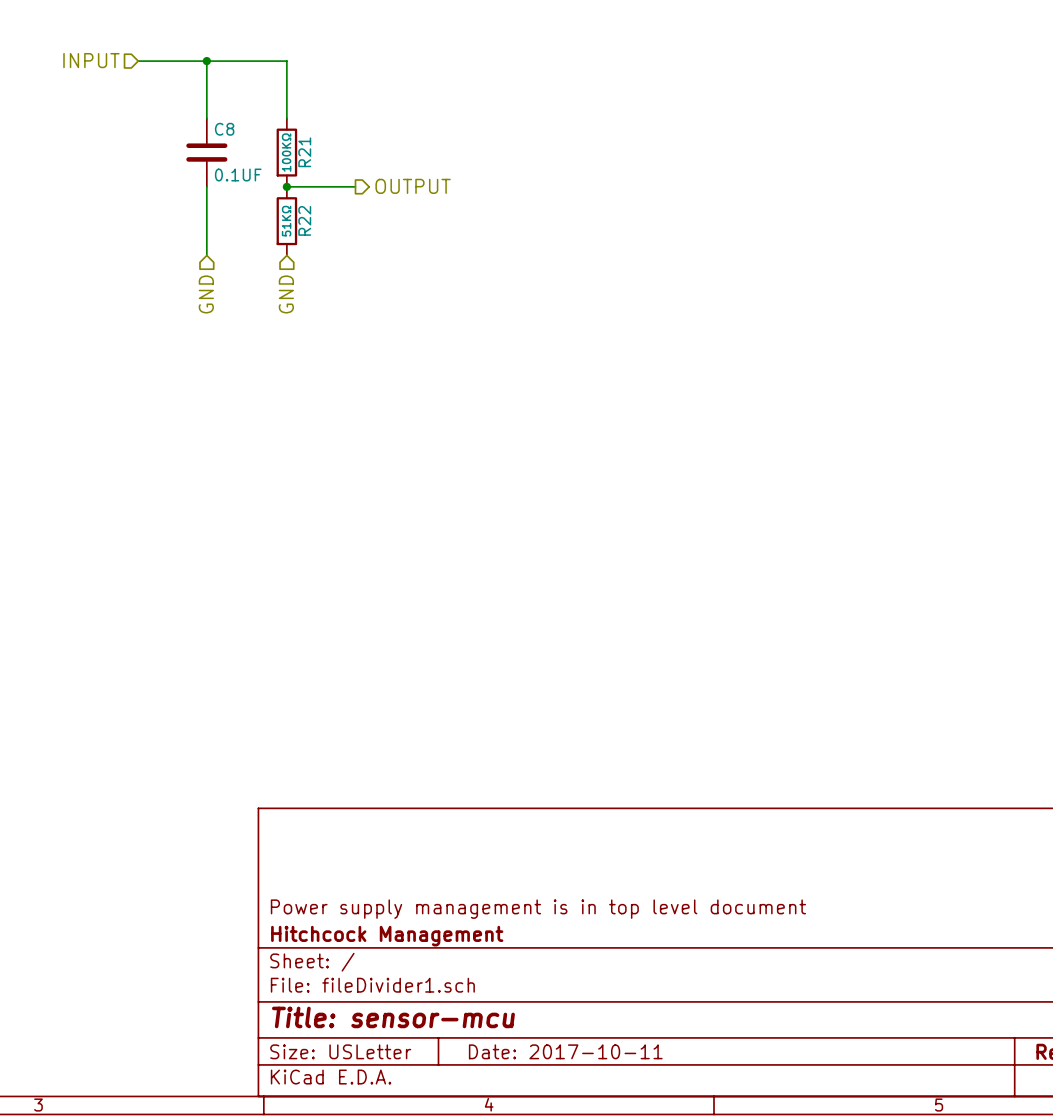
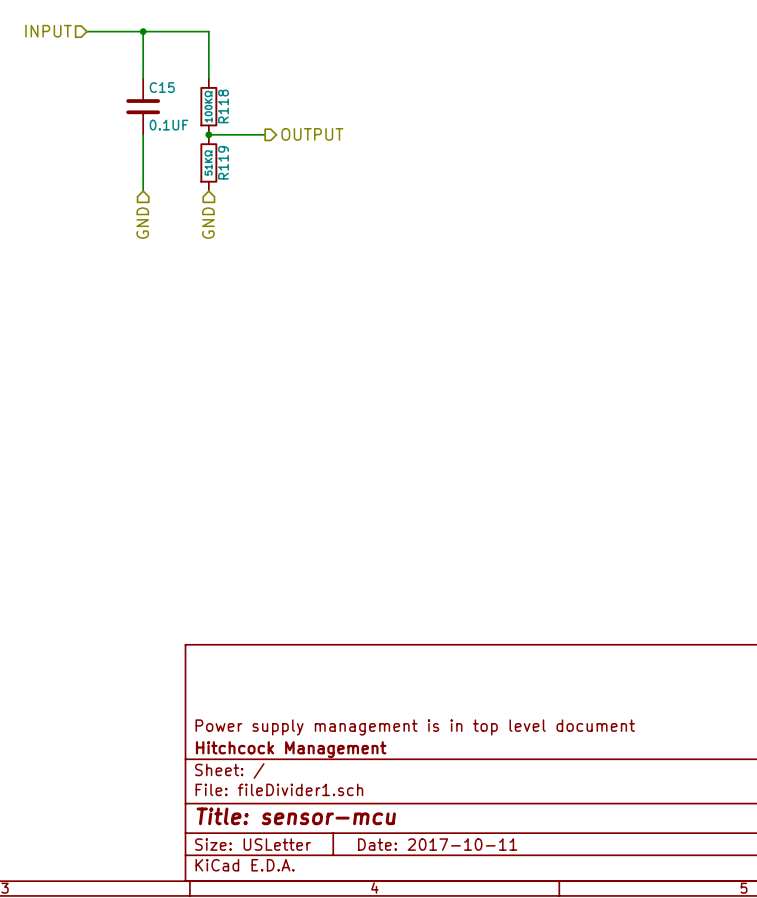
C8 name: C8 (224, 129) -> C15 (162, 87)
R21 name: R21 (304, 152) -> R118 (223, 106)
R22 name: R22 (304, 220) -> R119 (223, 162)

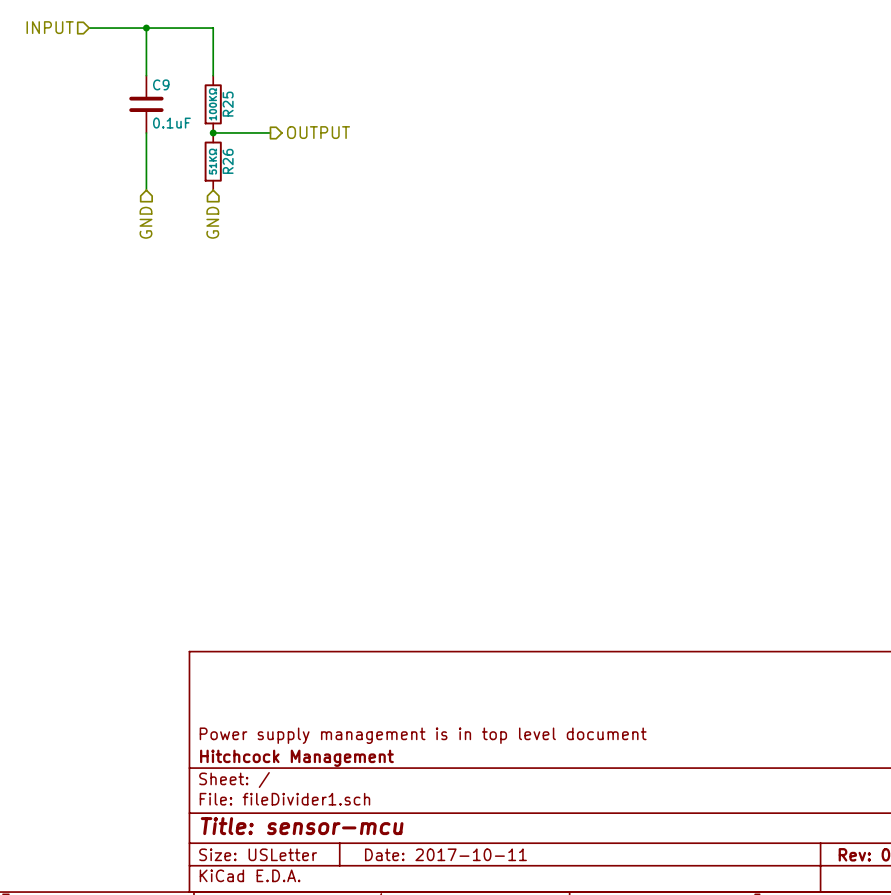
C15 name: C15 (162, 87) -> C9 (161, 84)
R118 name: R118 (223, 106) -> R25 (228, 104)
C15 value: 0.1UF (168, 125) -> 0.1uF (171, 123)
R119 name: R119 (223, 162) -> R26 (228, 161)

